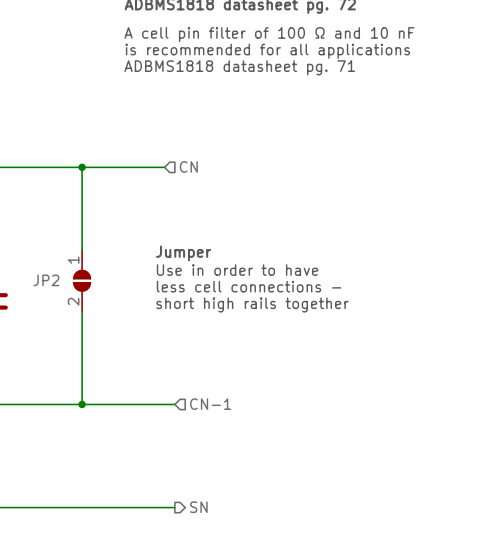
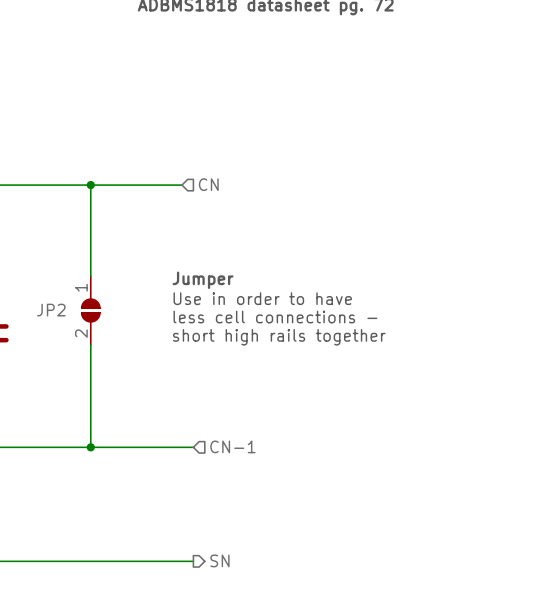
text: A cell pin filter of 100 Ω and 10 nF (269, 34) -> none
text: is recommended for all applications (267, 51) -> none
text: ADBMS1818 datasheet pg. 71 (239, 67) -> none

